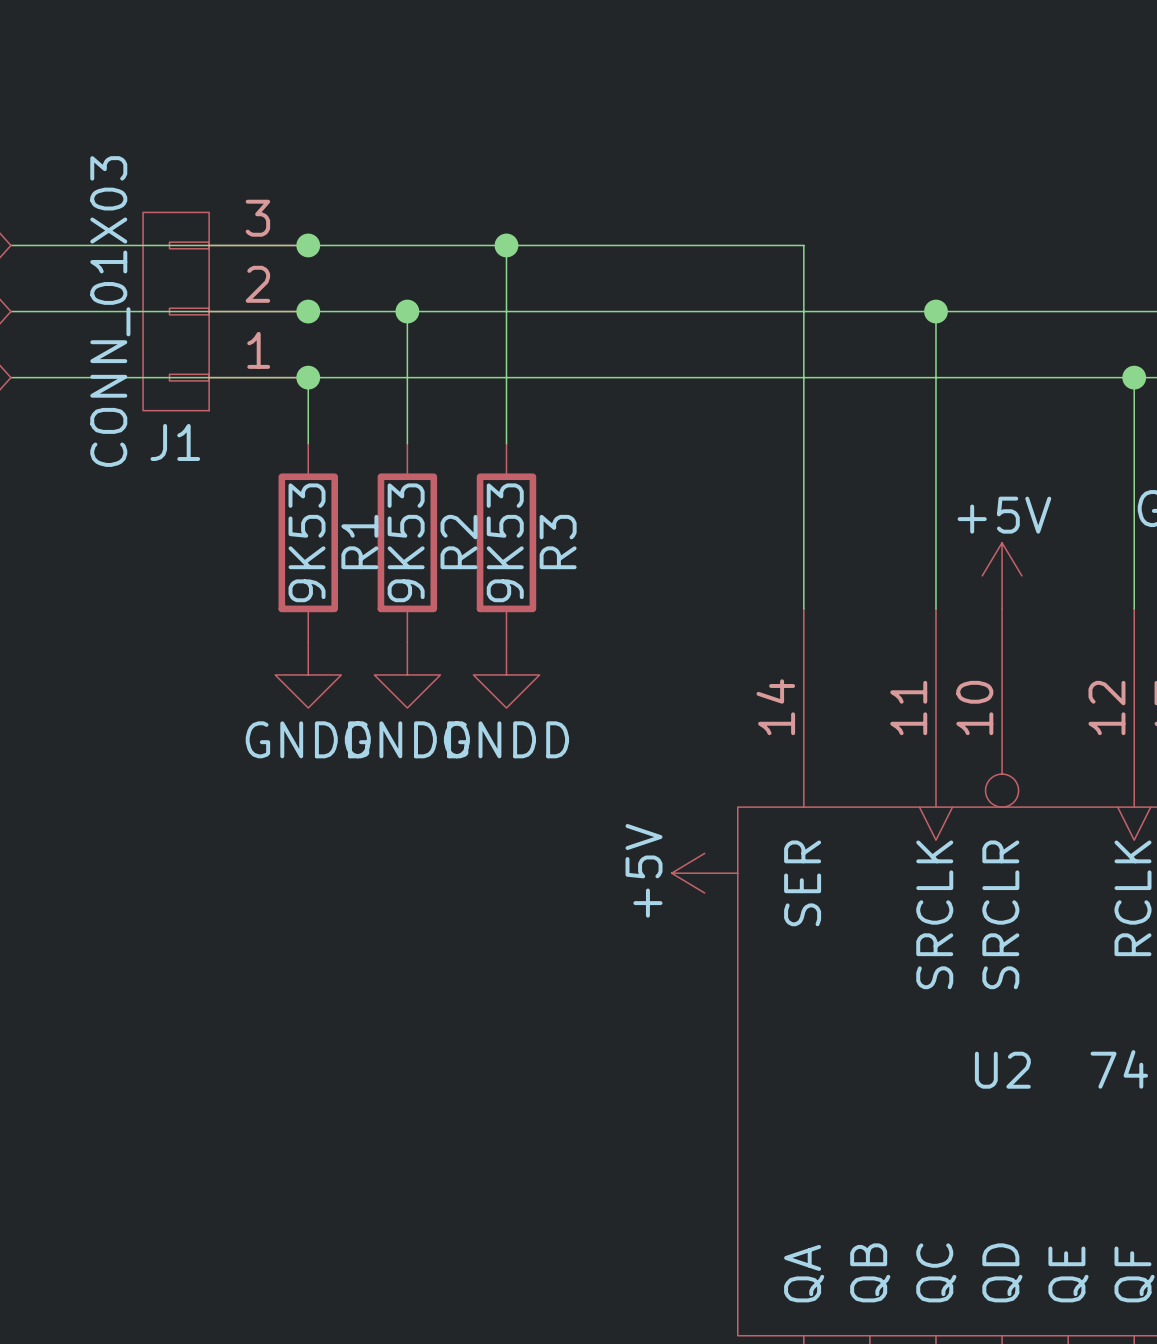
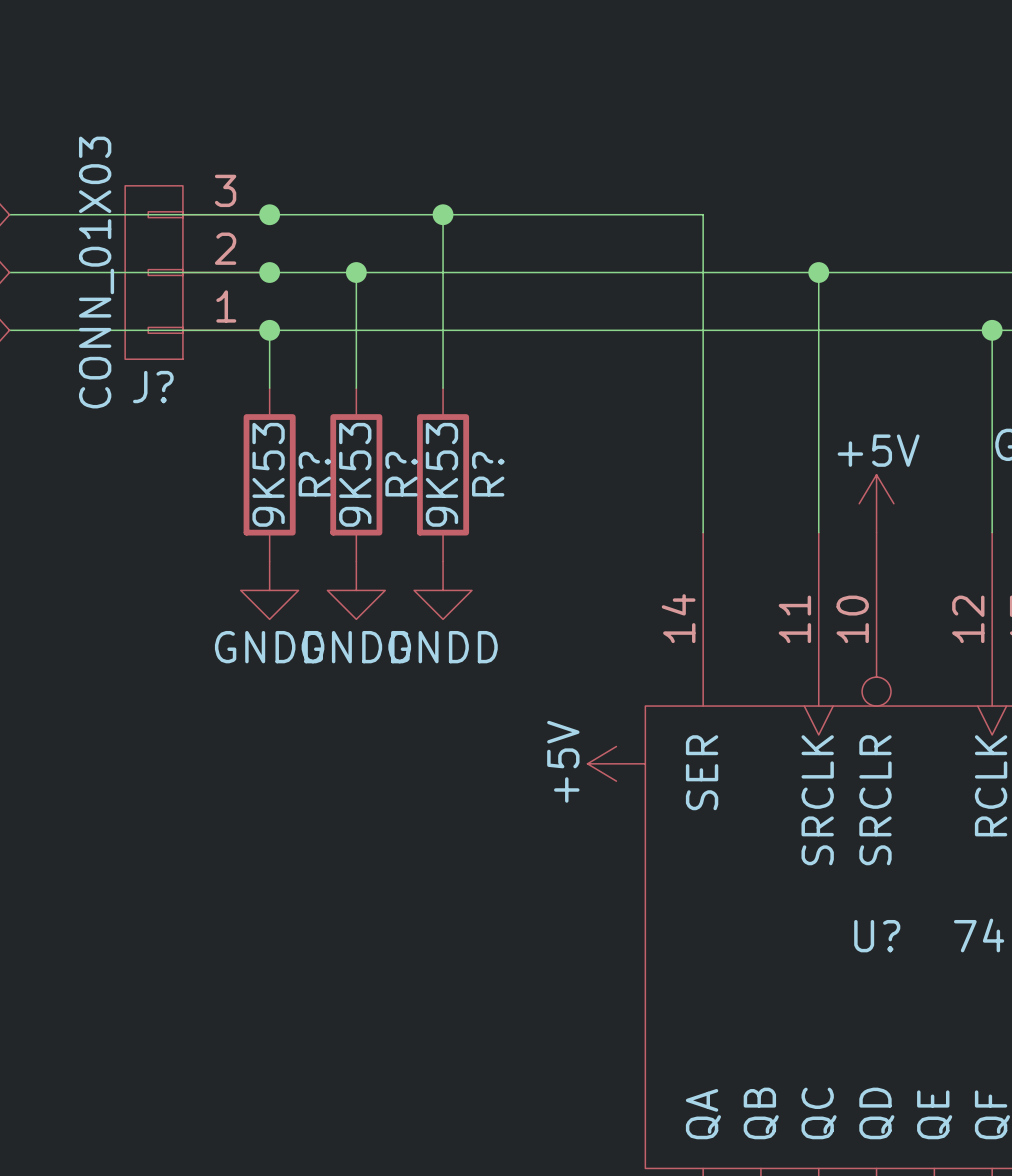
J1 name: J1 (175, 442) -> J? (153, 387)
R1 name: R1 (359, 542) -> R? (314, 474)
R2 name: R2 (458, 542) -> R? (401, 474)
R3 name: R3 (558, 542) -> R? (488, 474)
U2 name: U2 (1002, 1070) -> U? (877, 936)

